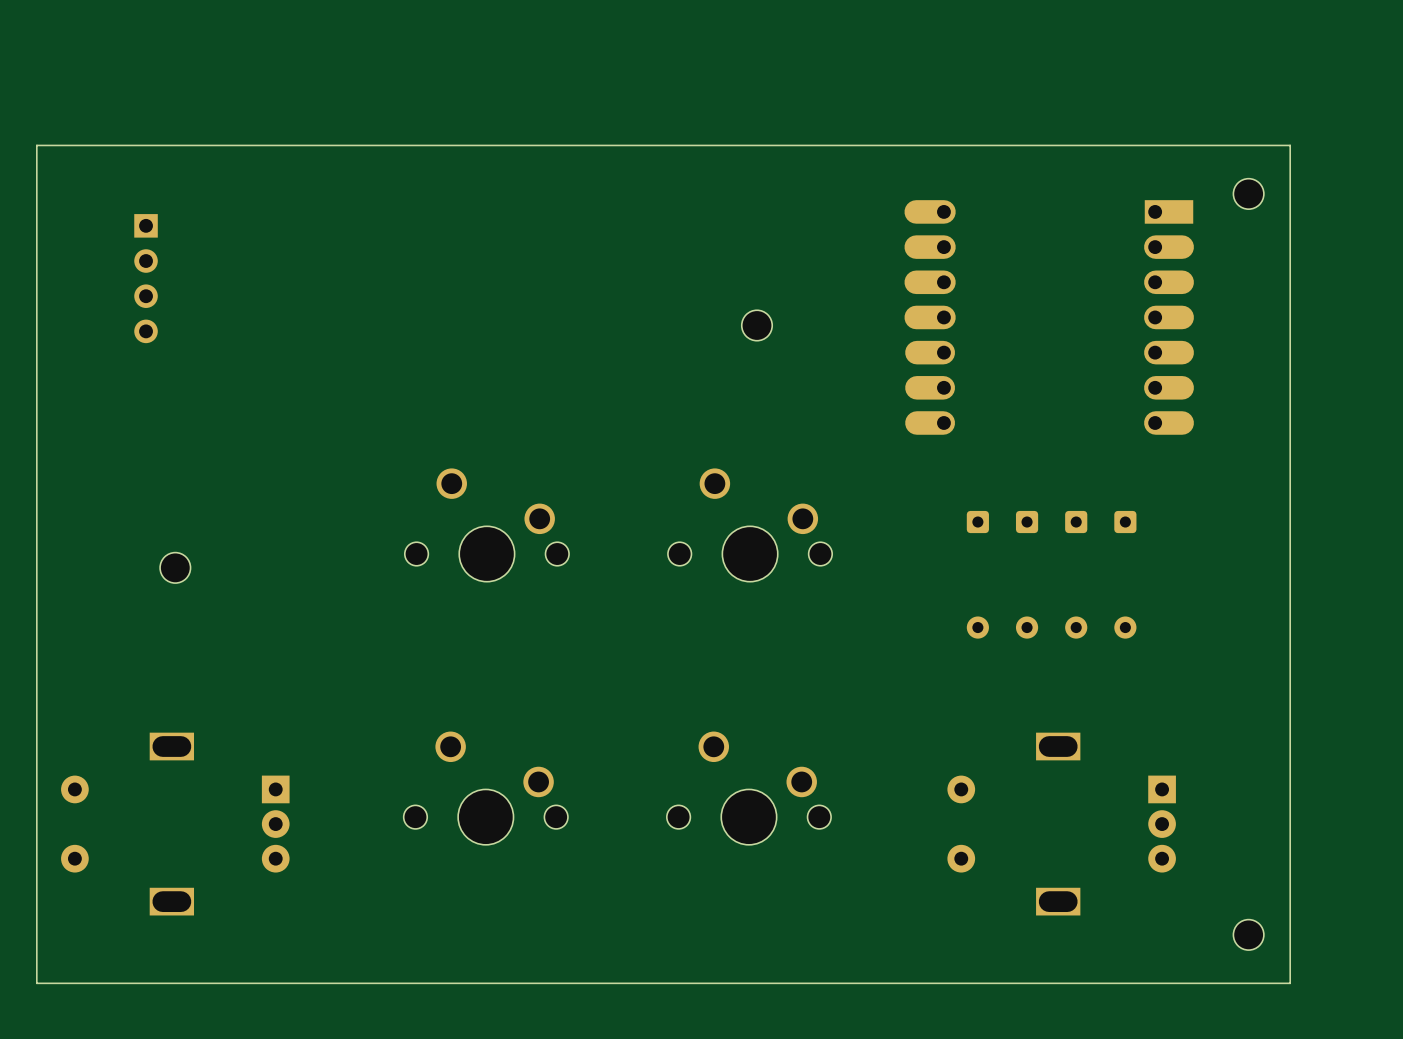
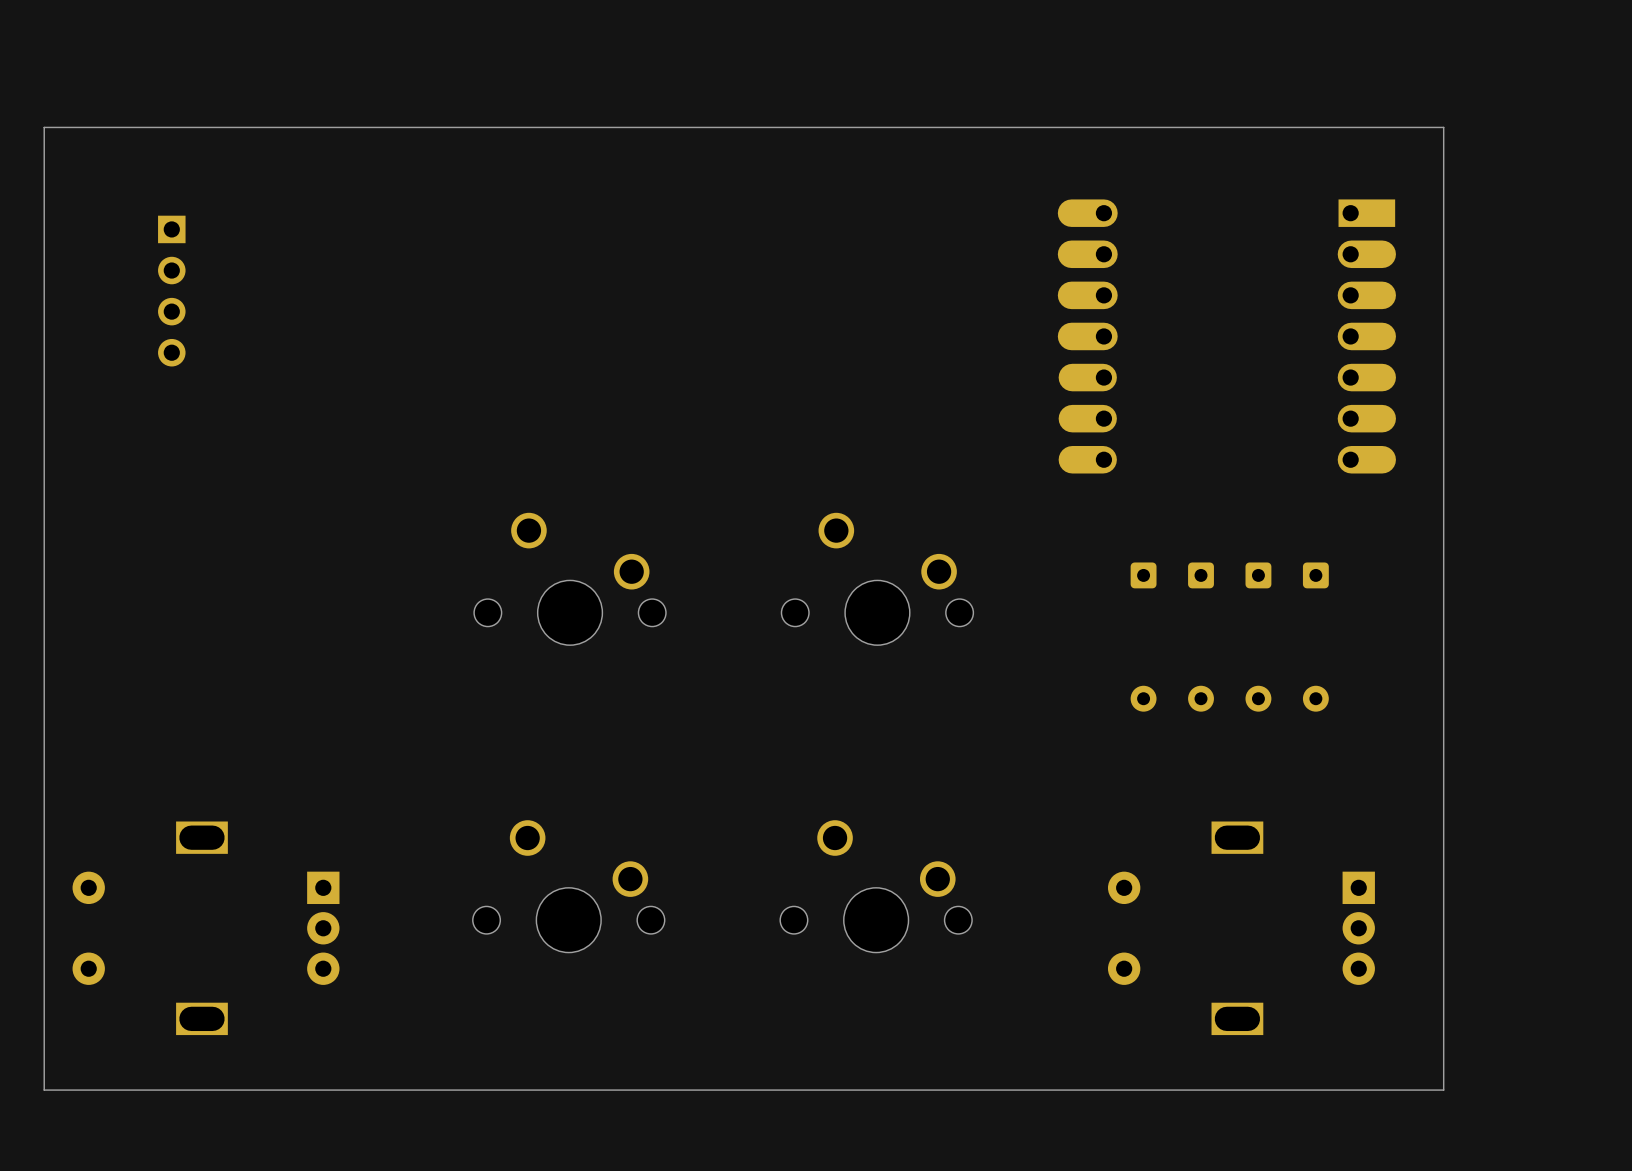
board edge: (36, 145) (1290, 145) (1290, 983) (36, 983) (36, 962) -> (44, 135) (44, 127) (1443, 127) (1443, 1090) (44, 1090)
part: (1248, 193) -> none
part: (756, 325) -> none
part: (175, 567) -> none
part: (1248, 934) -> none

